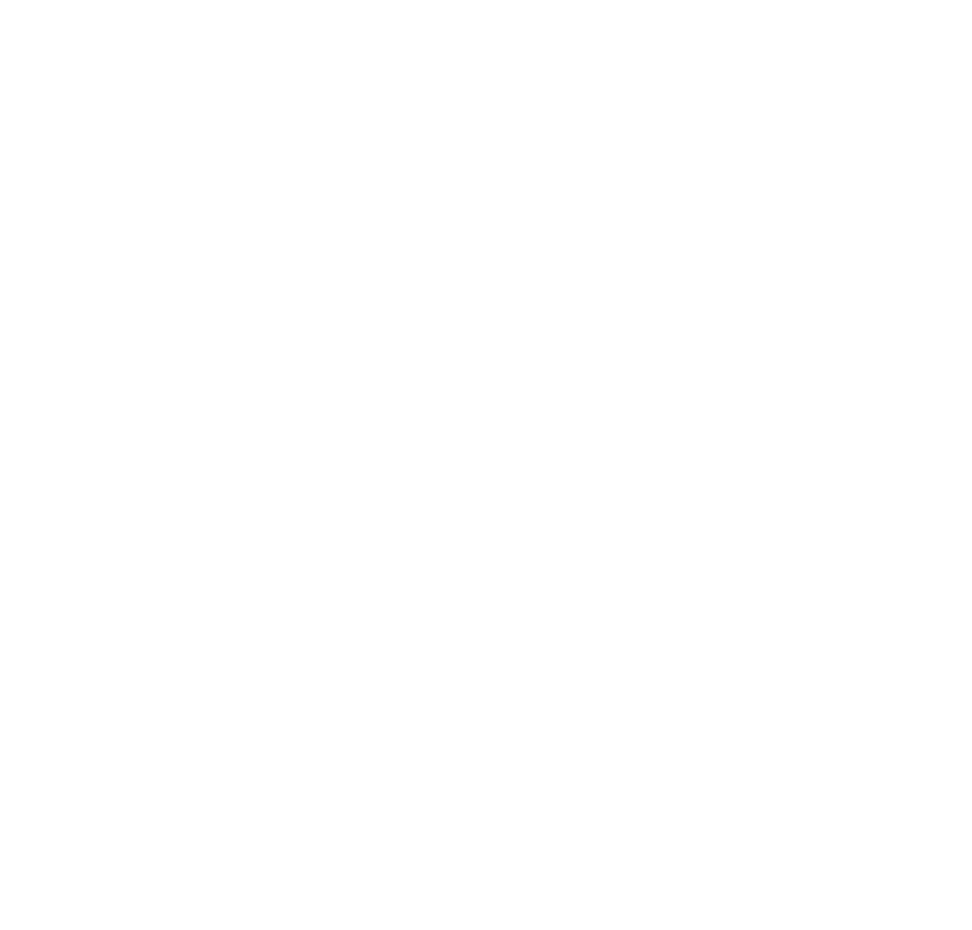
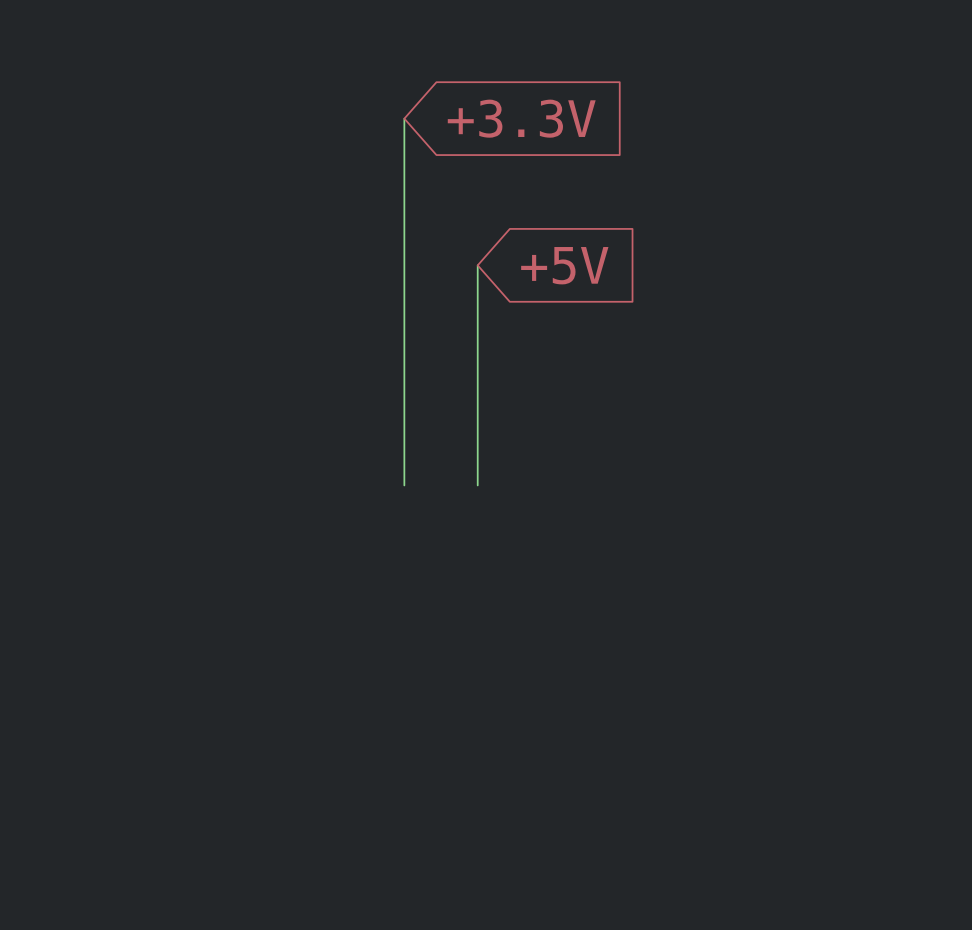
wire: none -> (404, 118) (404, 485)
global label: none -> +3.3V (521, 118)
wire: none -> (477, 265) (477, 485)
global label: none -> +5V (564, 265)

